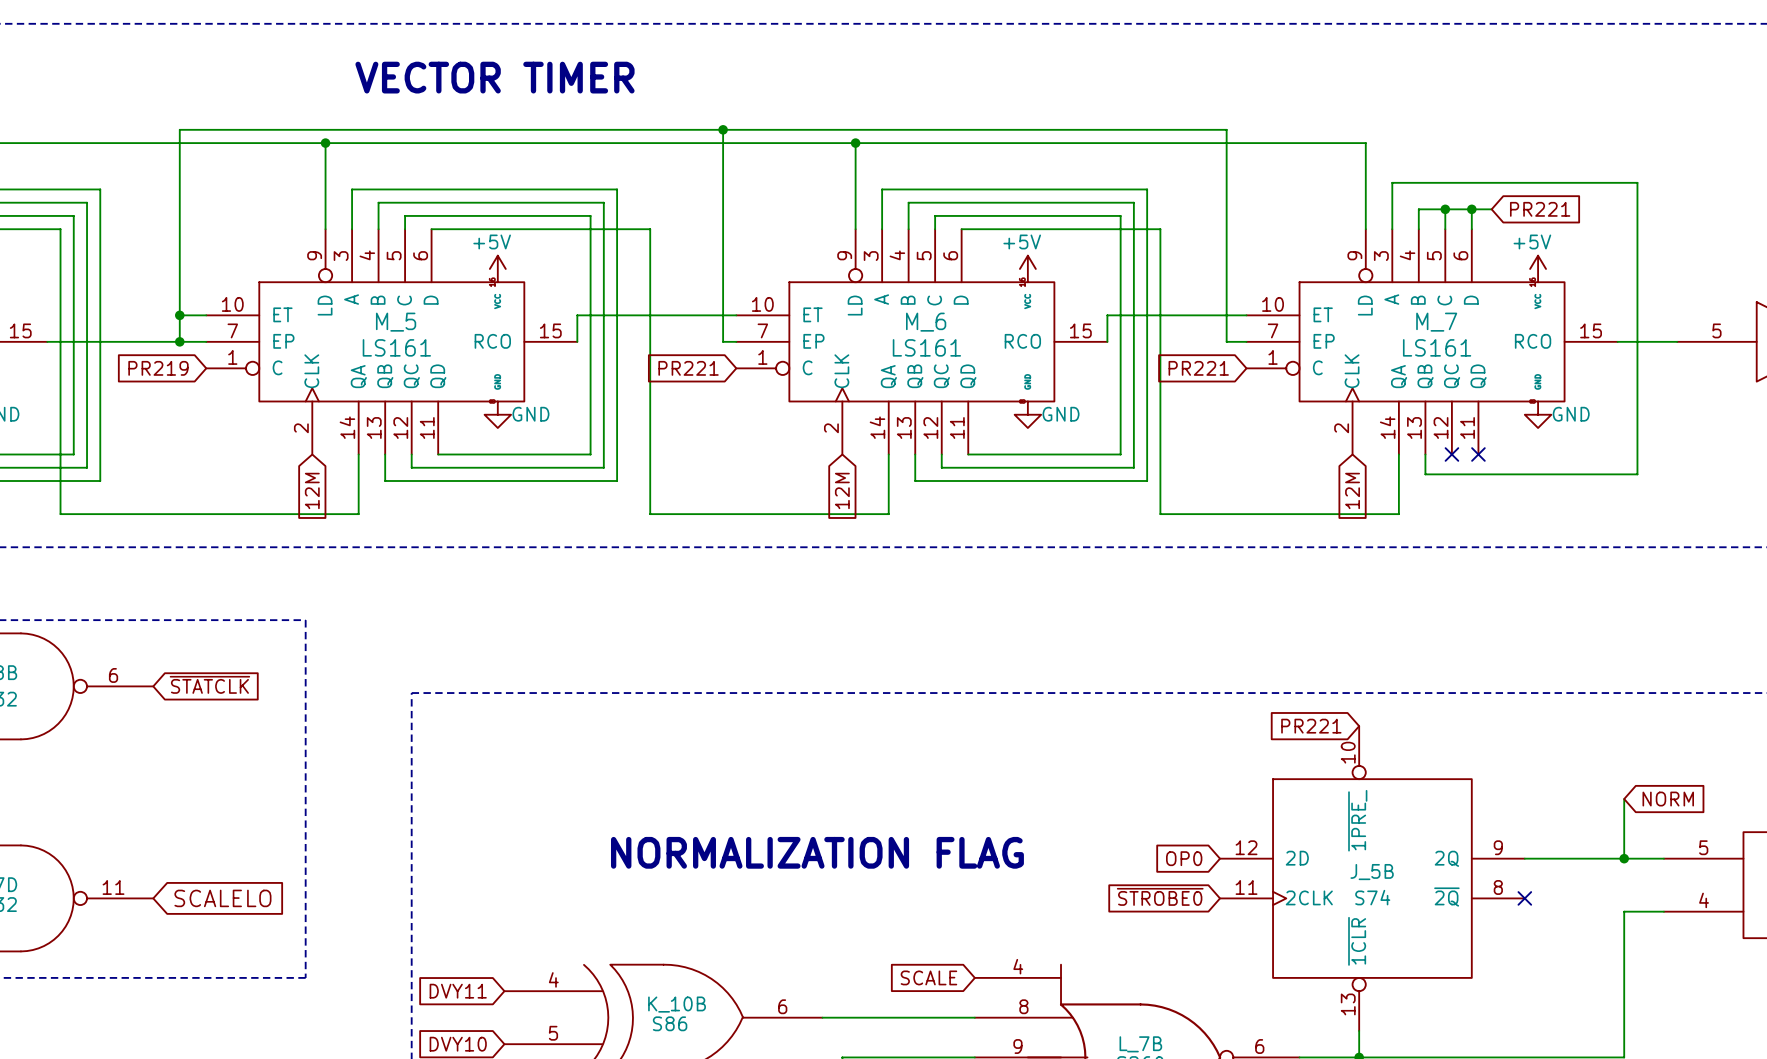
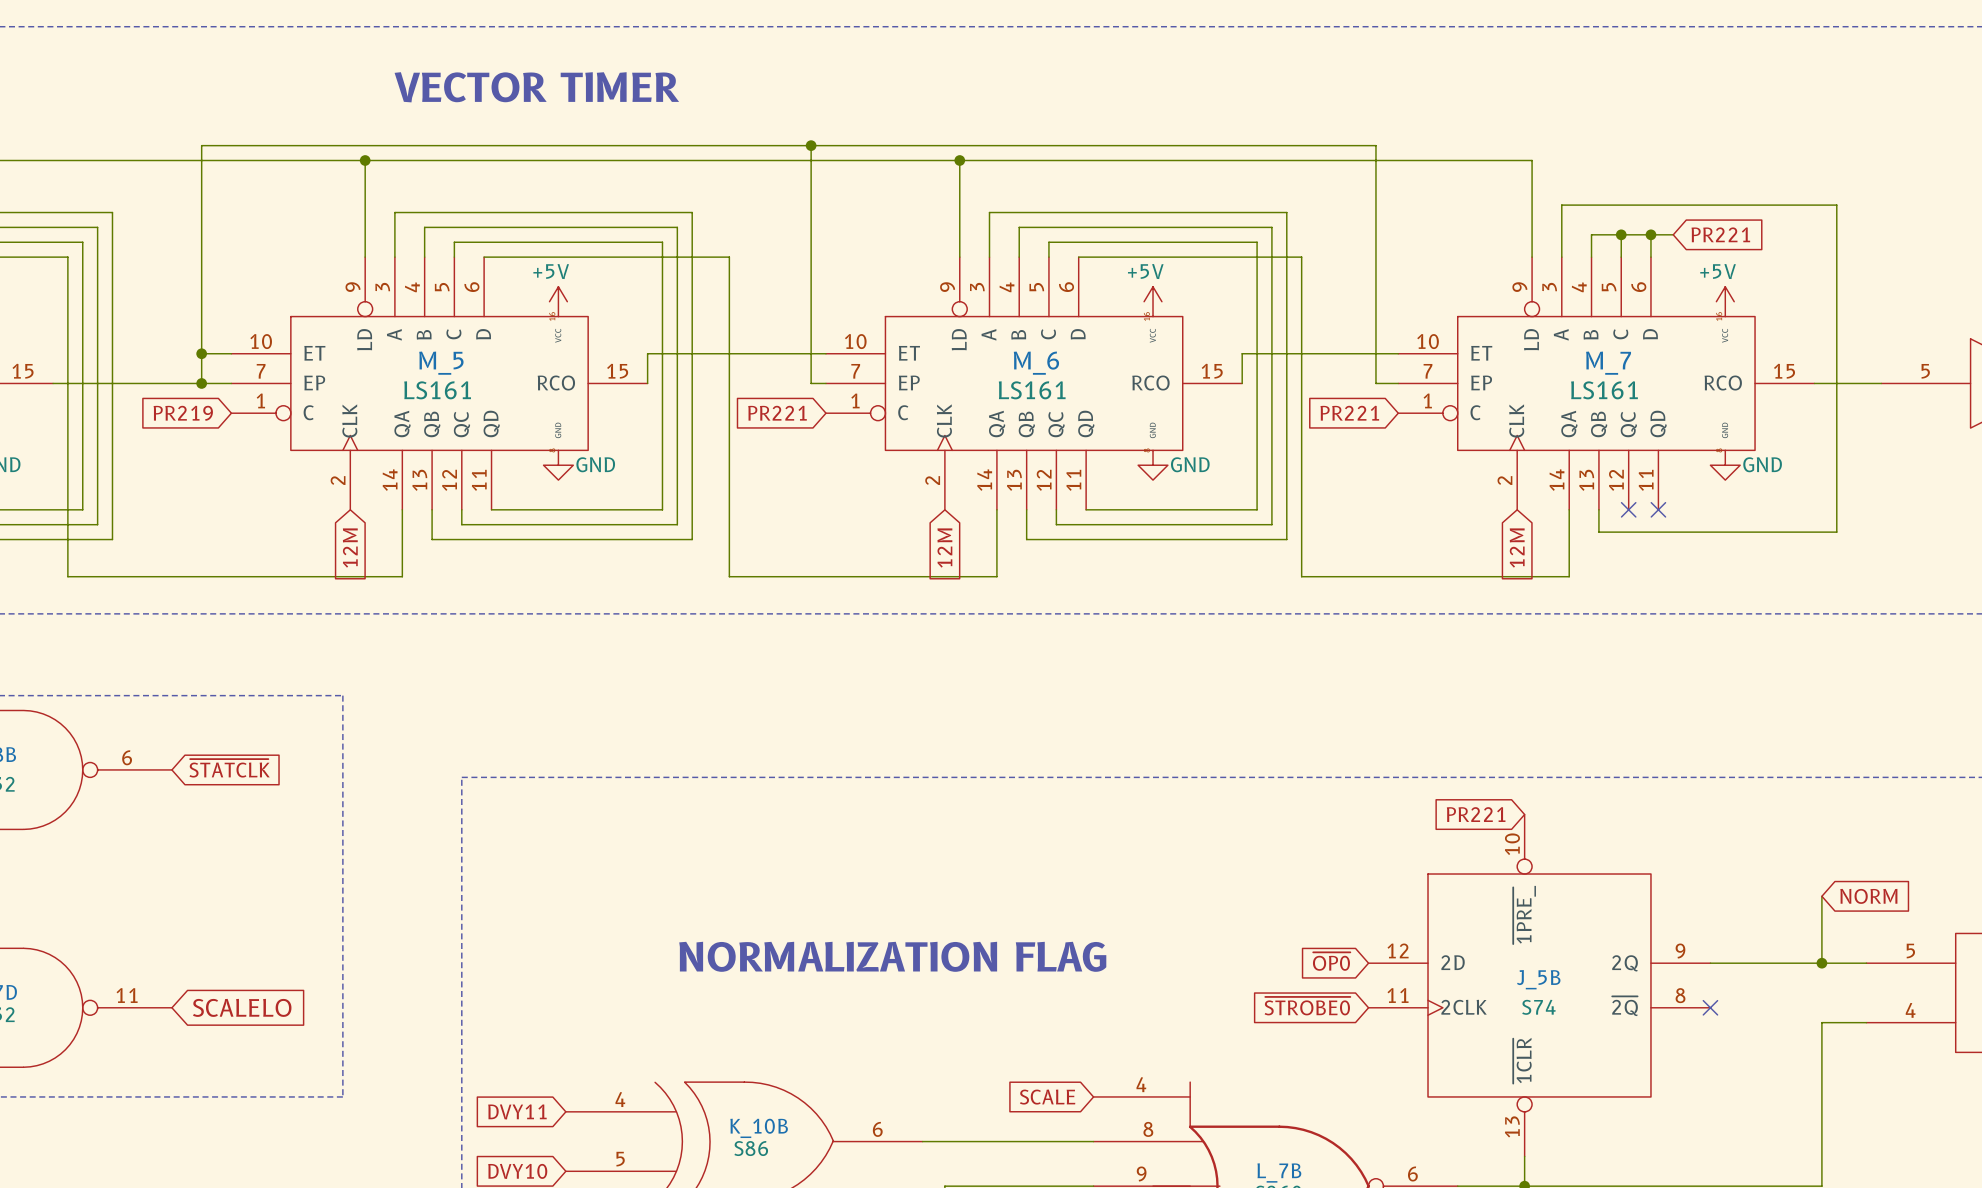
global label: OP0 (1184, 858) -> ~{OP0} (1331, 961)

